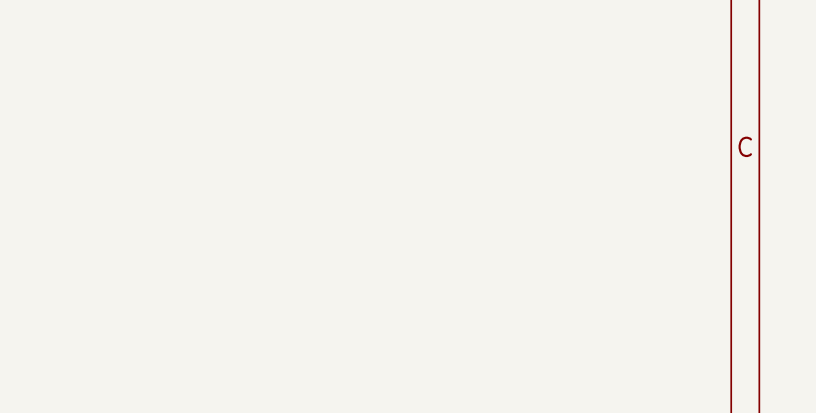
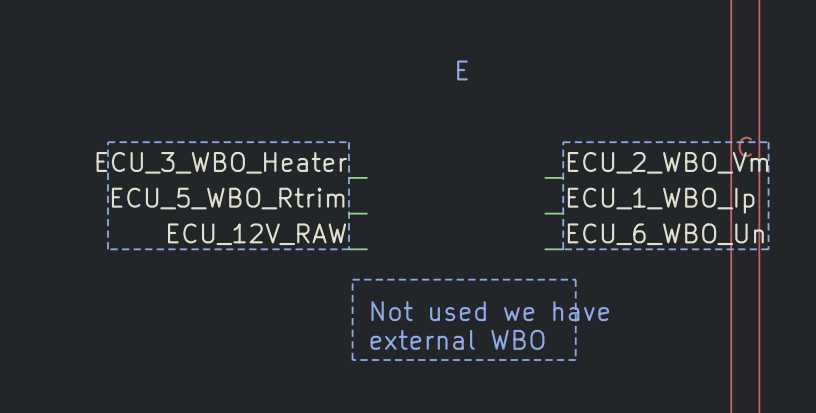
text: none -> E (462, 70)
line: none -> (107, 142) (349, 142) (349, 249) (107, 249) (107, 142)
line: none -> (563, 142) (768, 142) (768, 249) (563, 249) (563, 142)
label: none -> ECU_3_WBO_Heater (221, 162)
label: none -> ECU_2_WBO_Vm (667, 162)
wire: none -> (349, 177) (366, 177)
wire: none -> (545, 177) (563, 177)
label: none -> ECU_5_WBO_Rtrim (228, 198)
label: none -> ECU_1_WBO_Ip (661, 200)
wire: none -> (349, 213) (366, 213)
wire: none -> (545, 213) (563, 213)
label: none -> ECU_12V_RAW (257, 234)
label: none -> ECU_6_WBO_Un (665, 234)
wire: none -> (349, 249) (366, 249)
wire: none -> (545, 249) (563, 249)
line: none -> (352, 279) (575, 279) (575, 360) (352, 360) (352, 279)
text: none -> Not used we have (490, 311)
text: none -> external WBO (457, 339)

